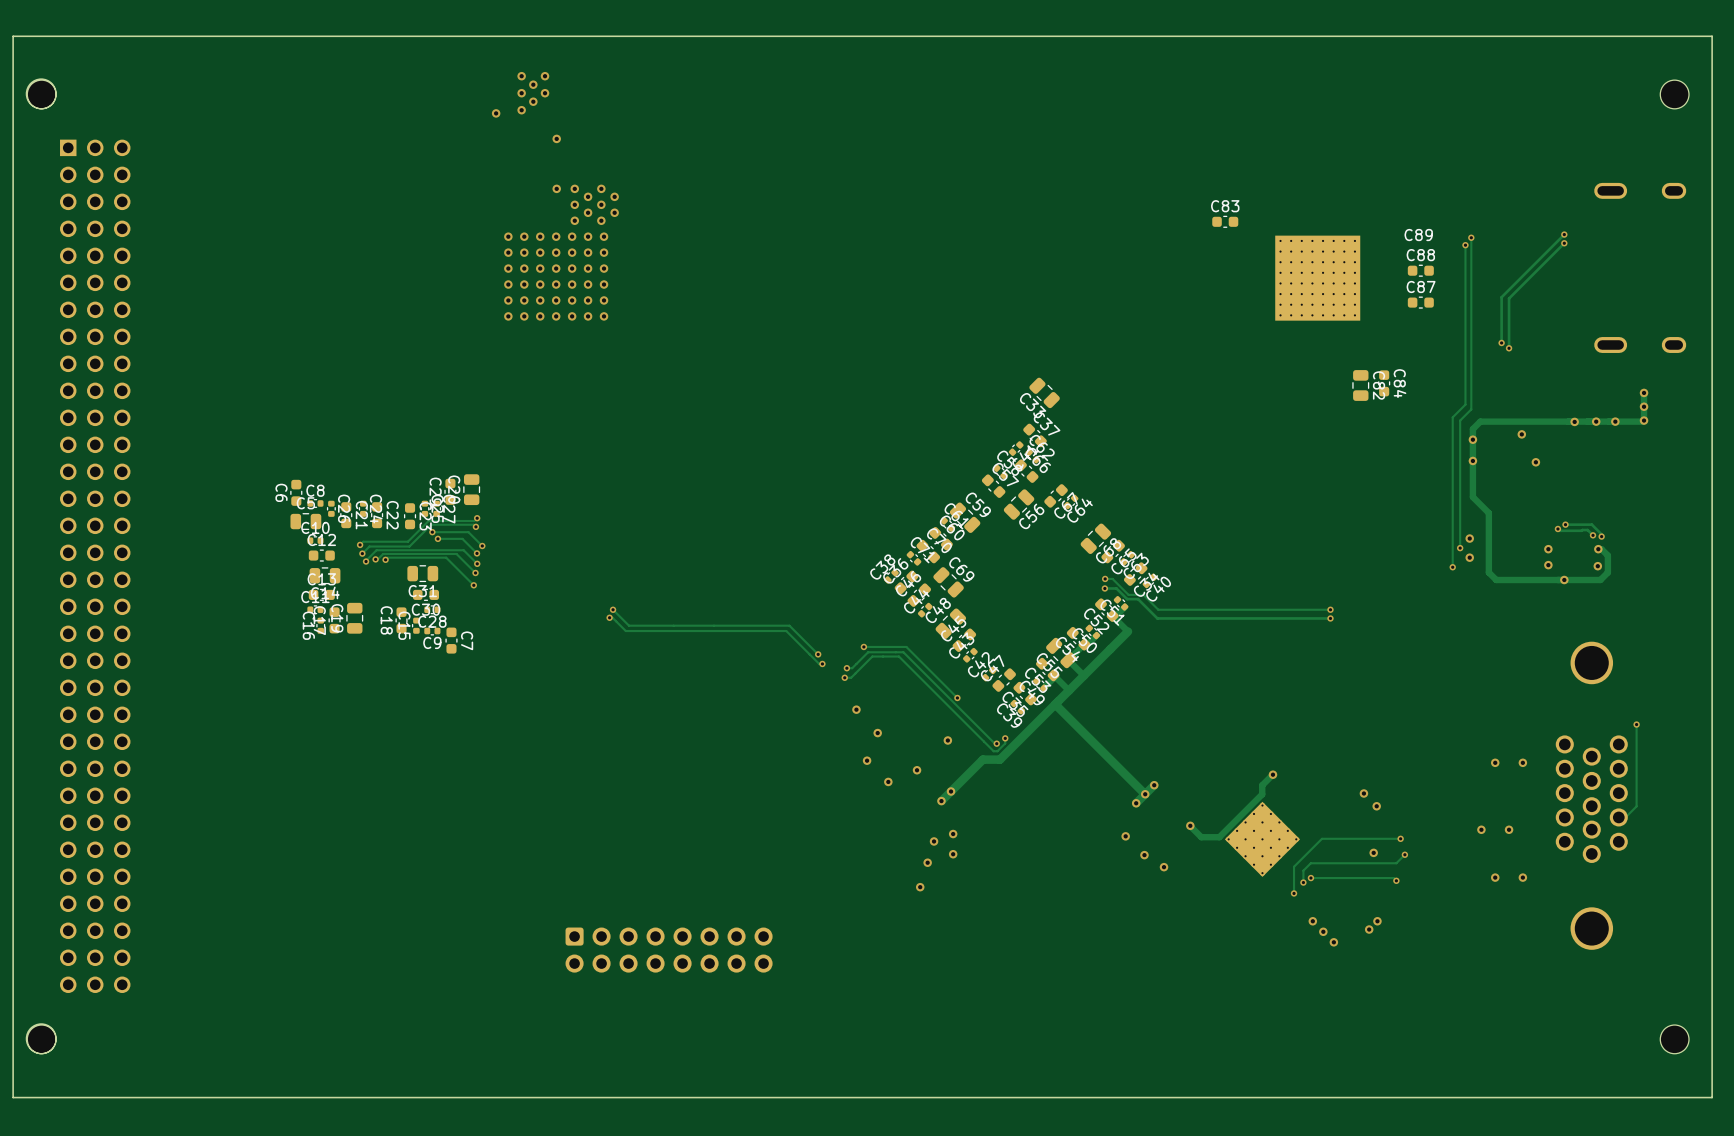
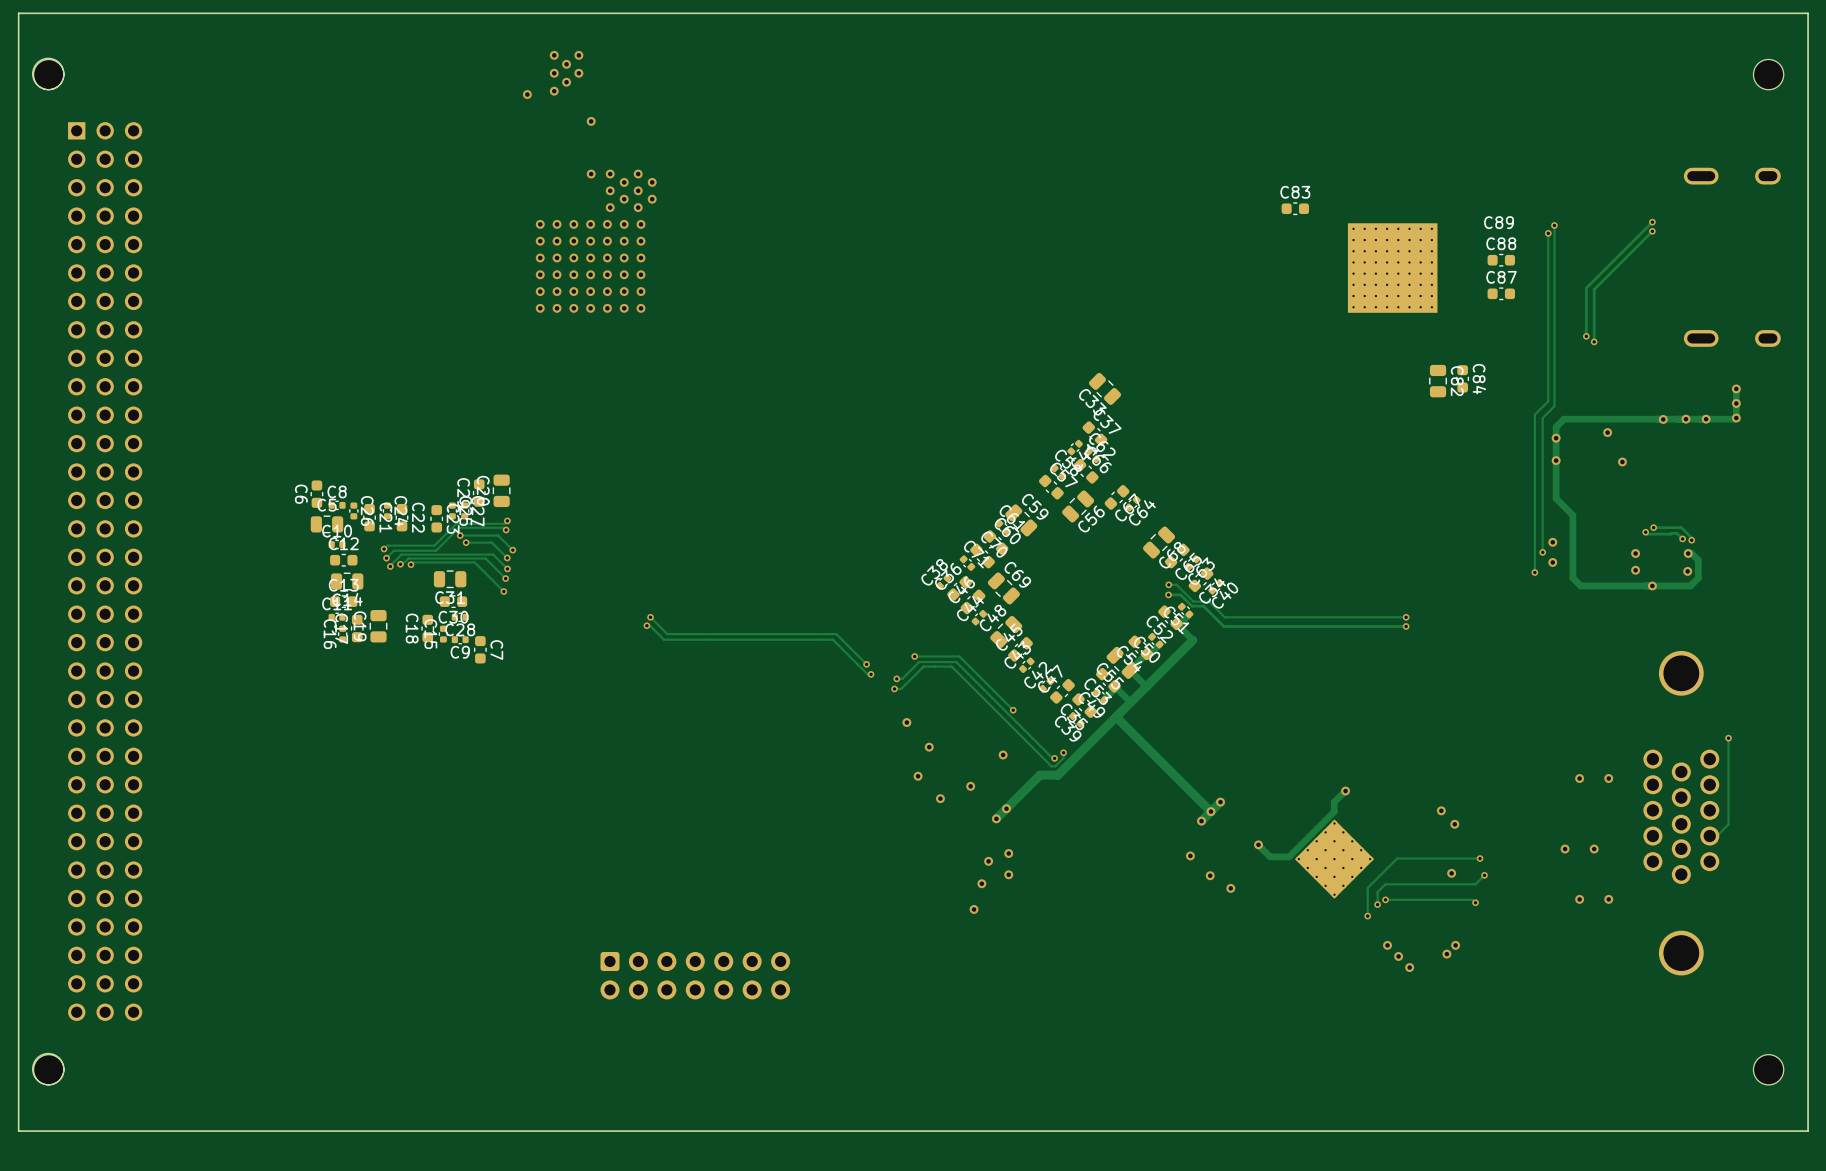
part: (669, 950) -> none

